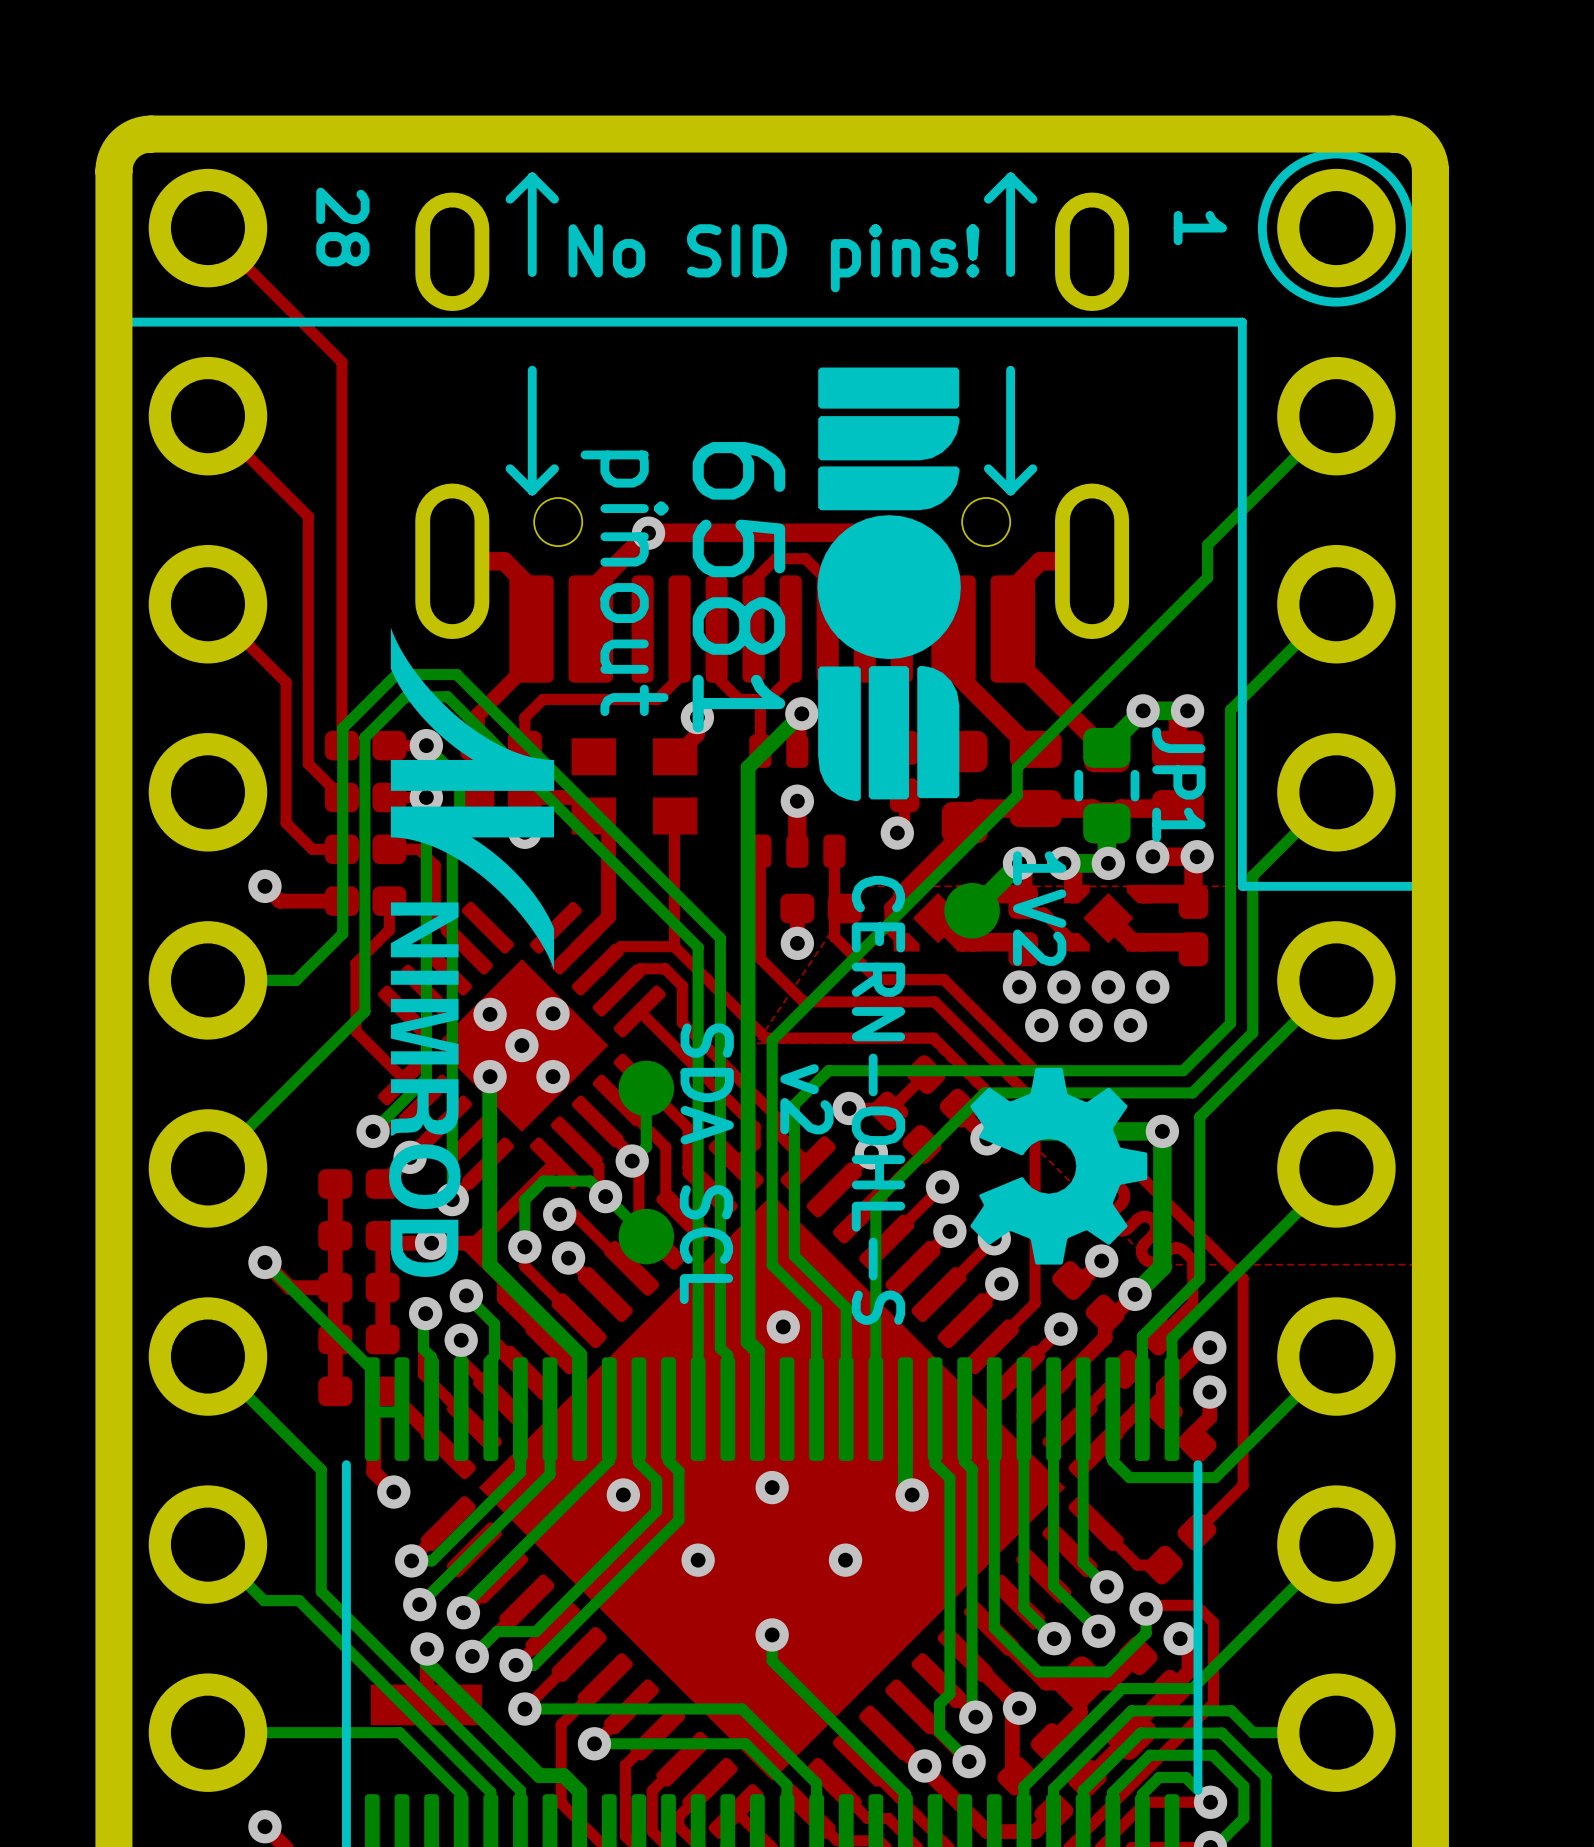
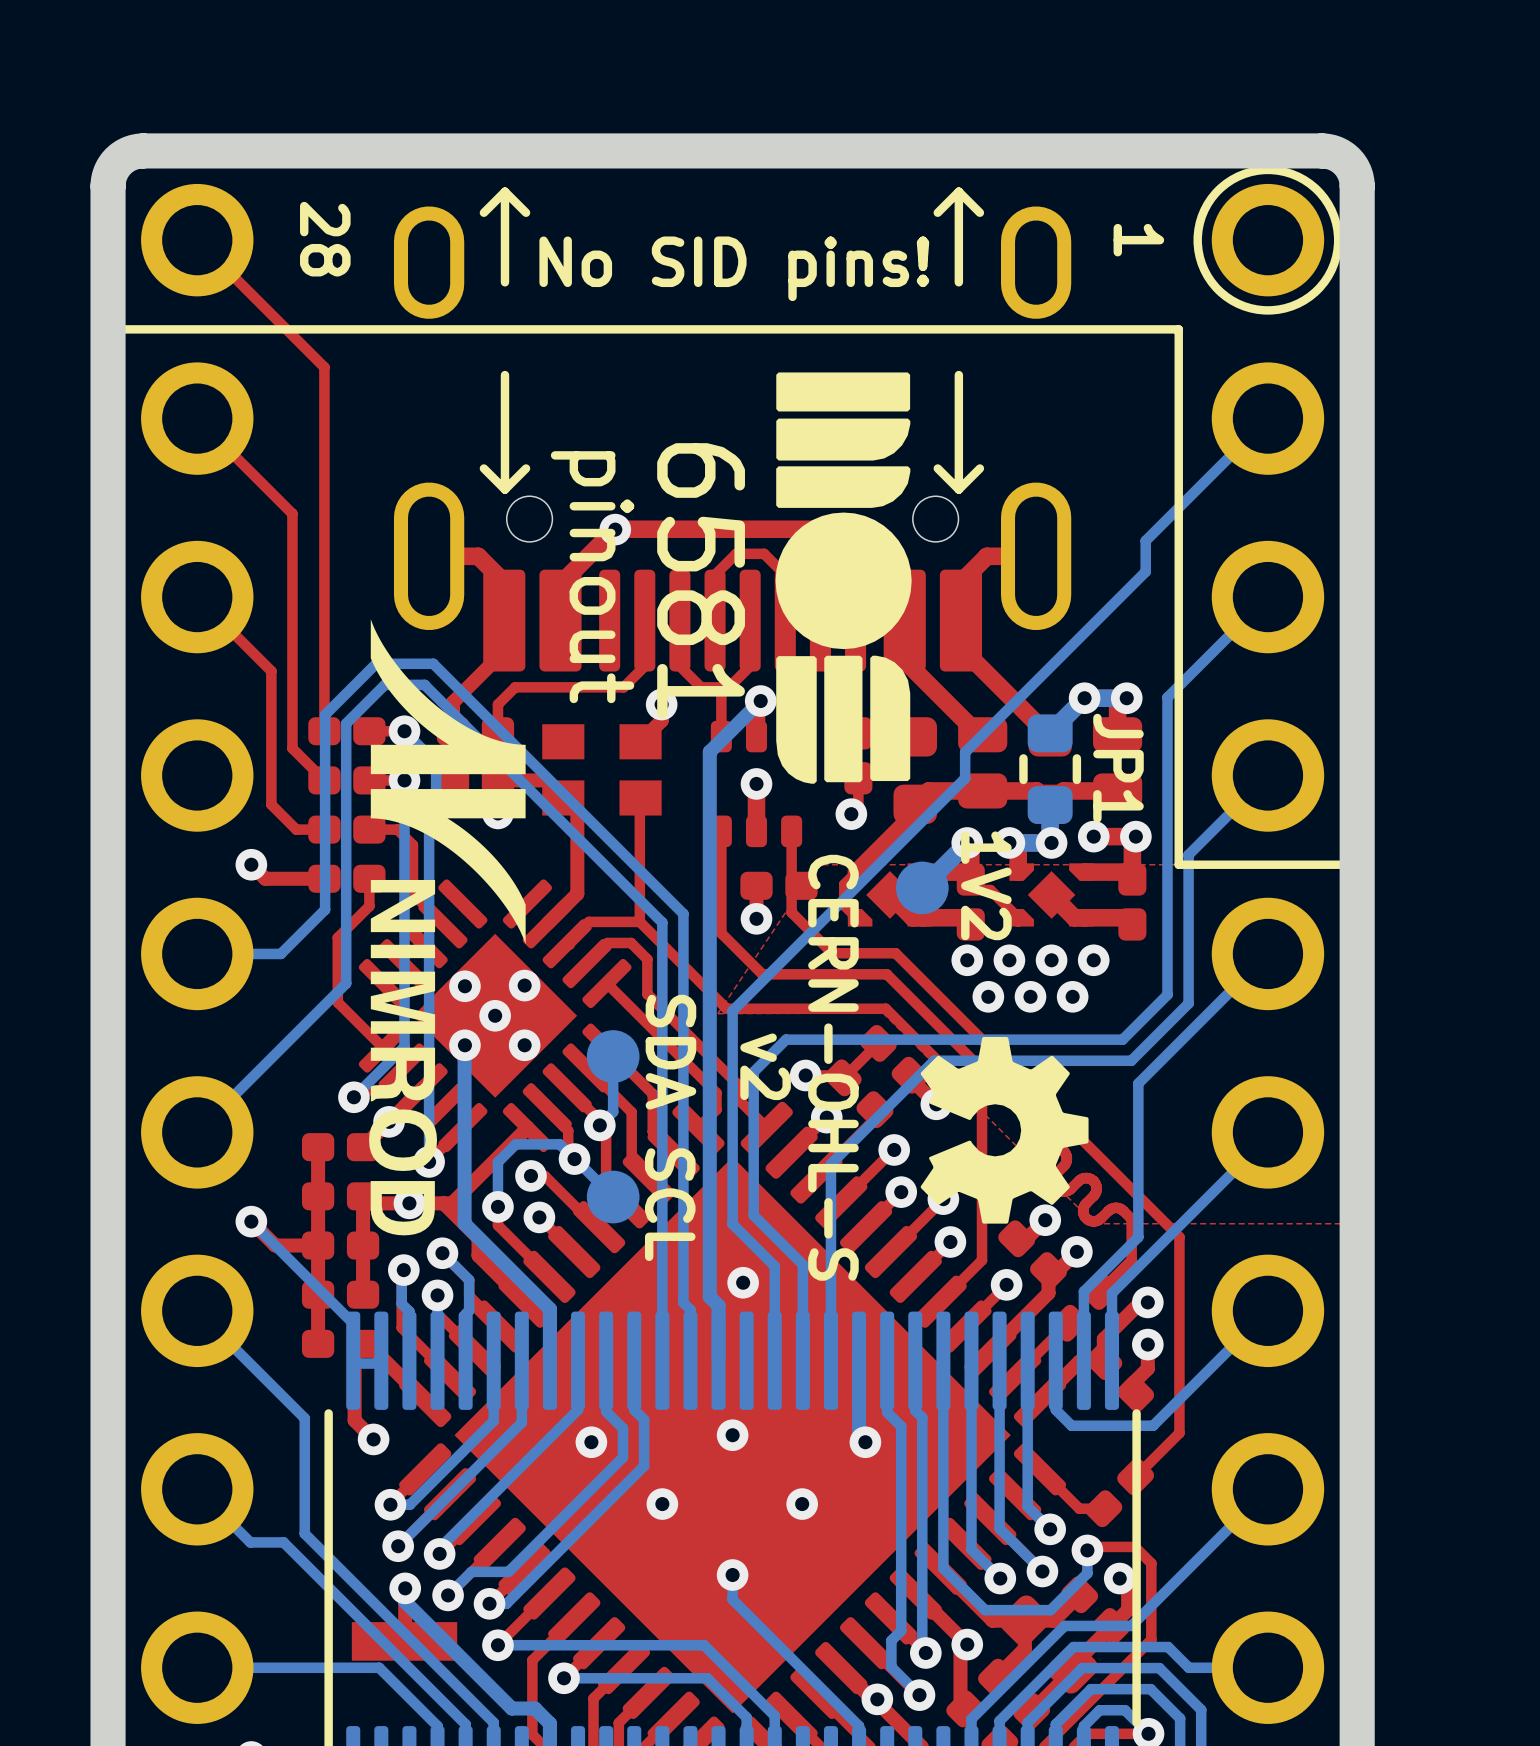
via: (1162, 1131) -> none
bottom track: (986, 1138) (994, 1131) (1162, 1131) (1162, 1266) (1135, 1294) -> none

